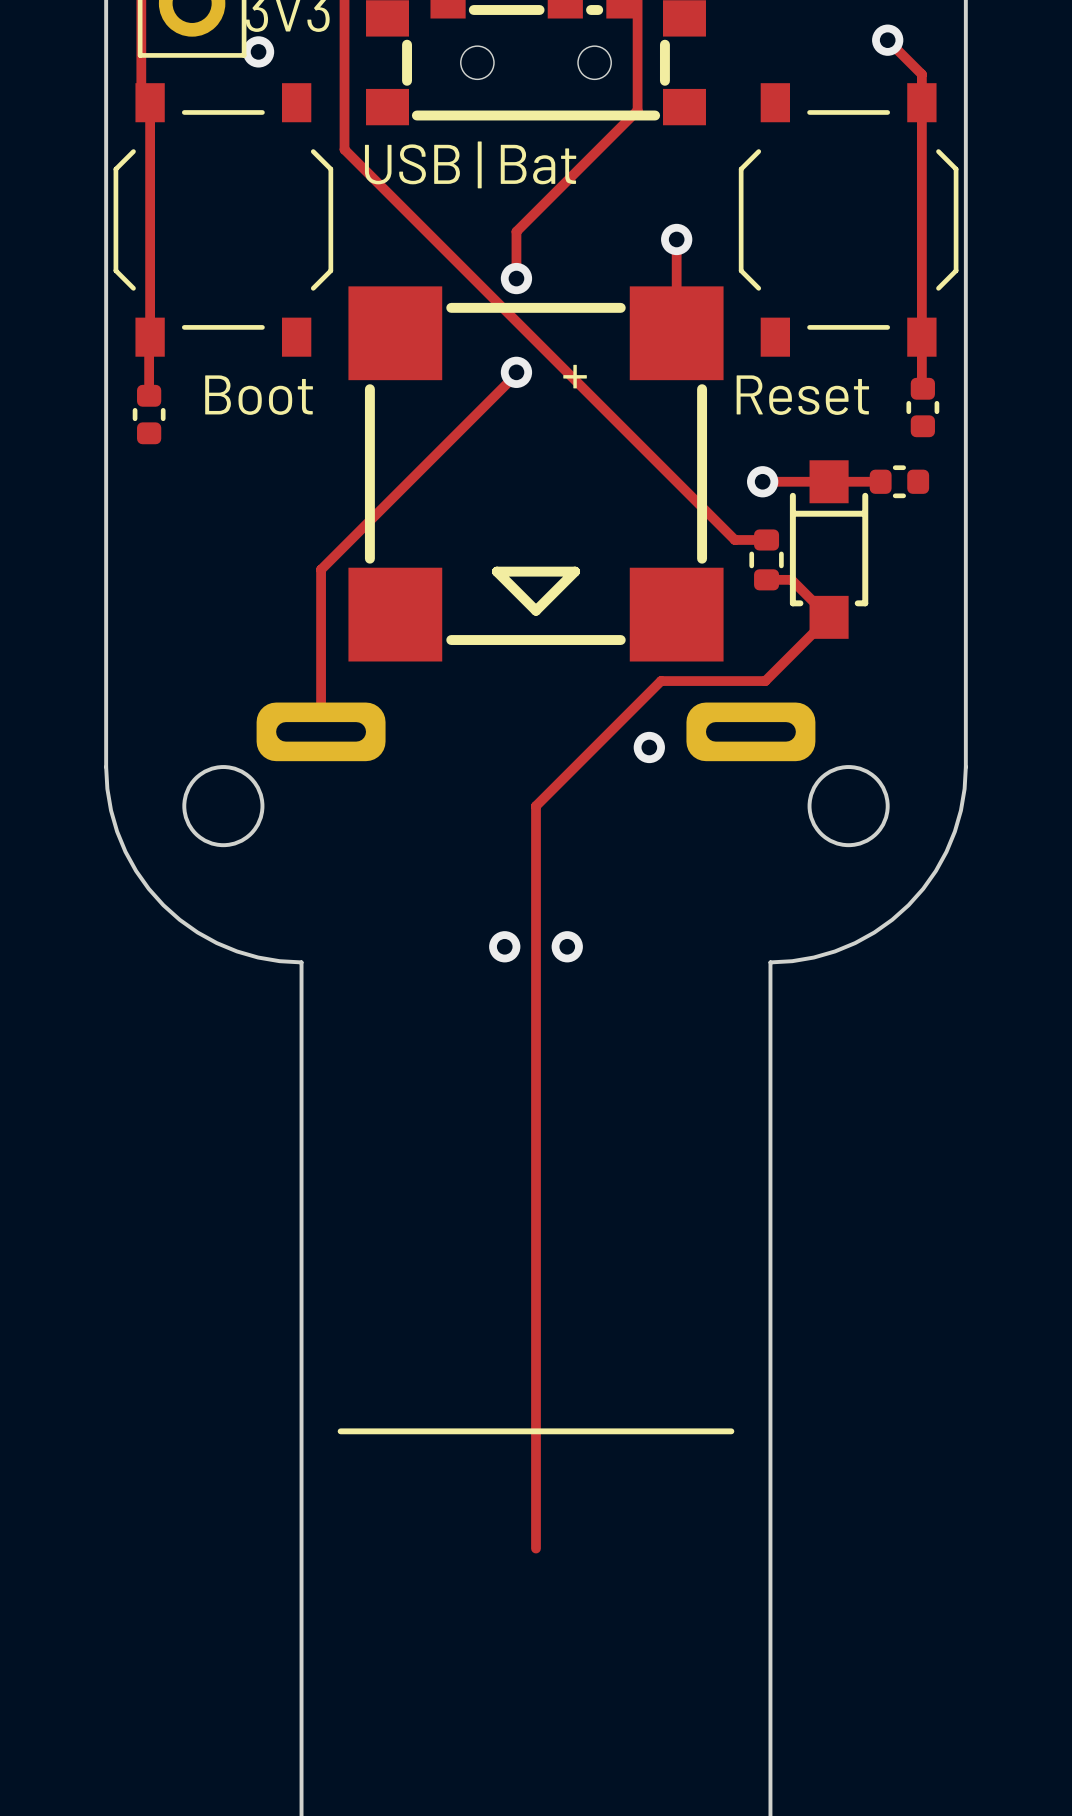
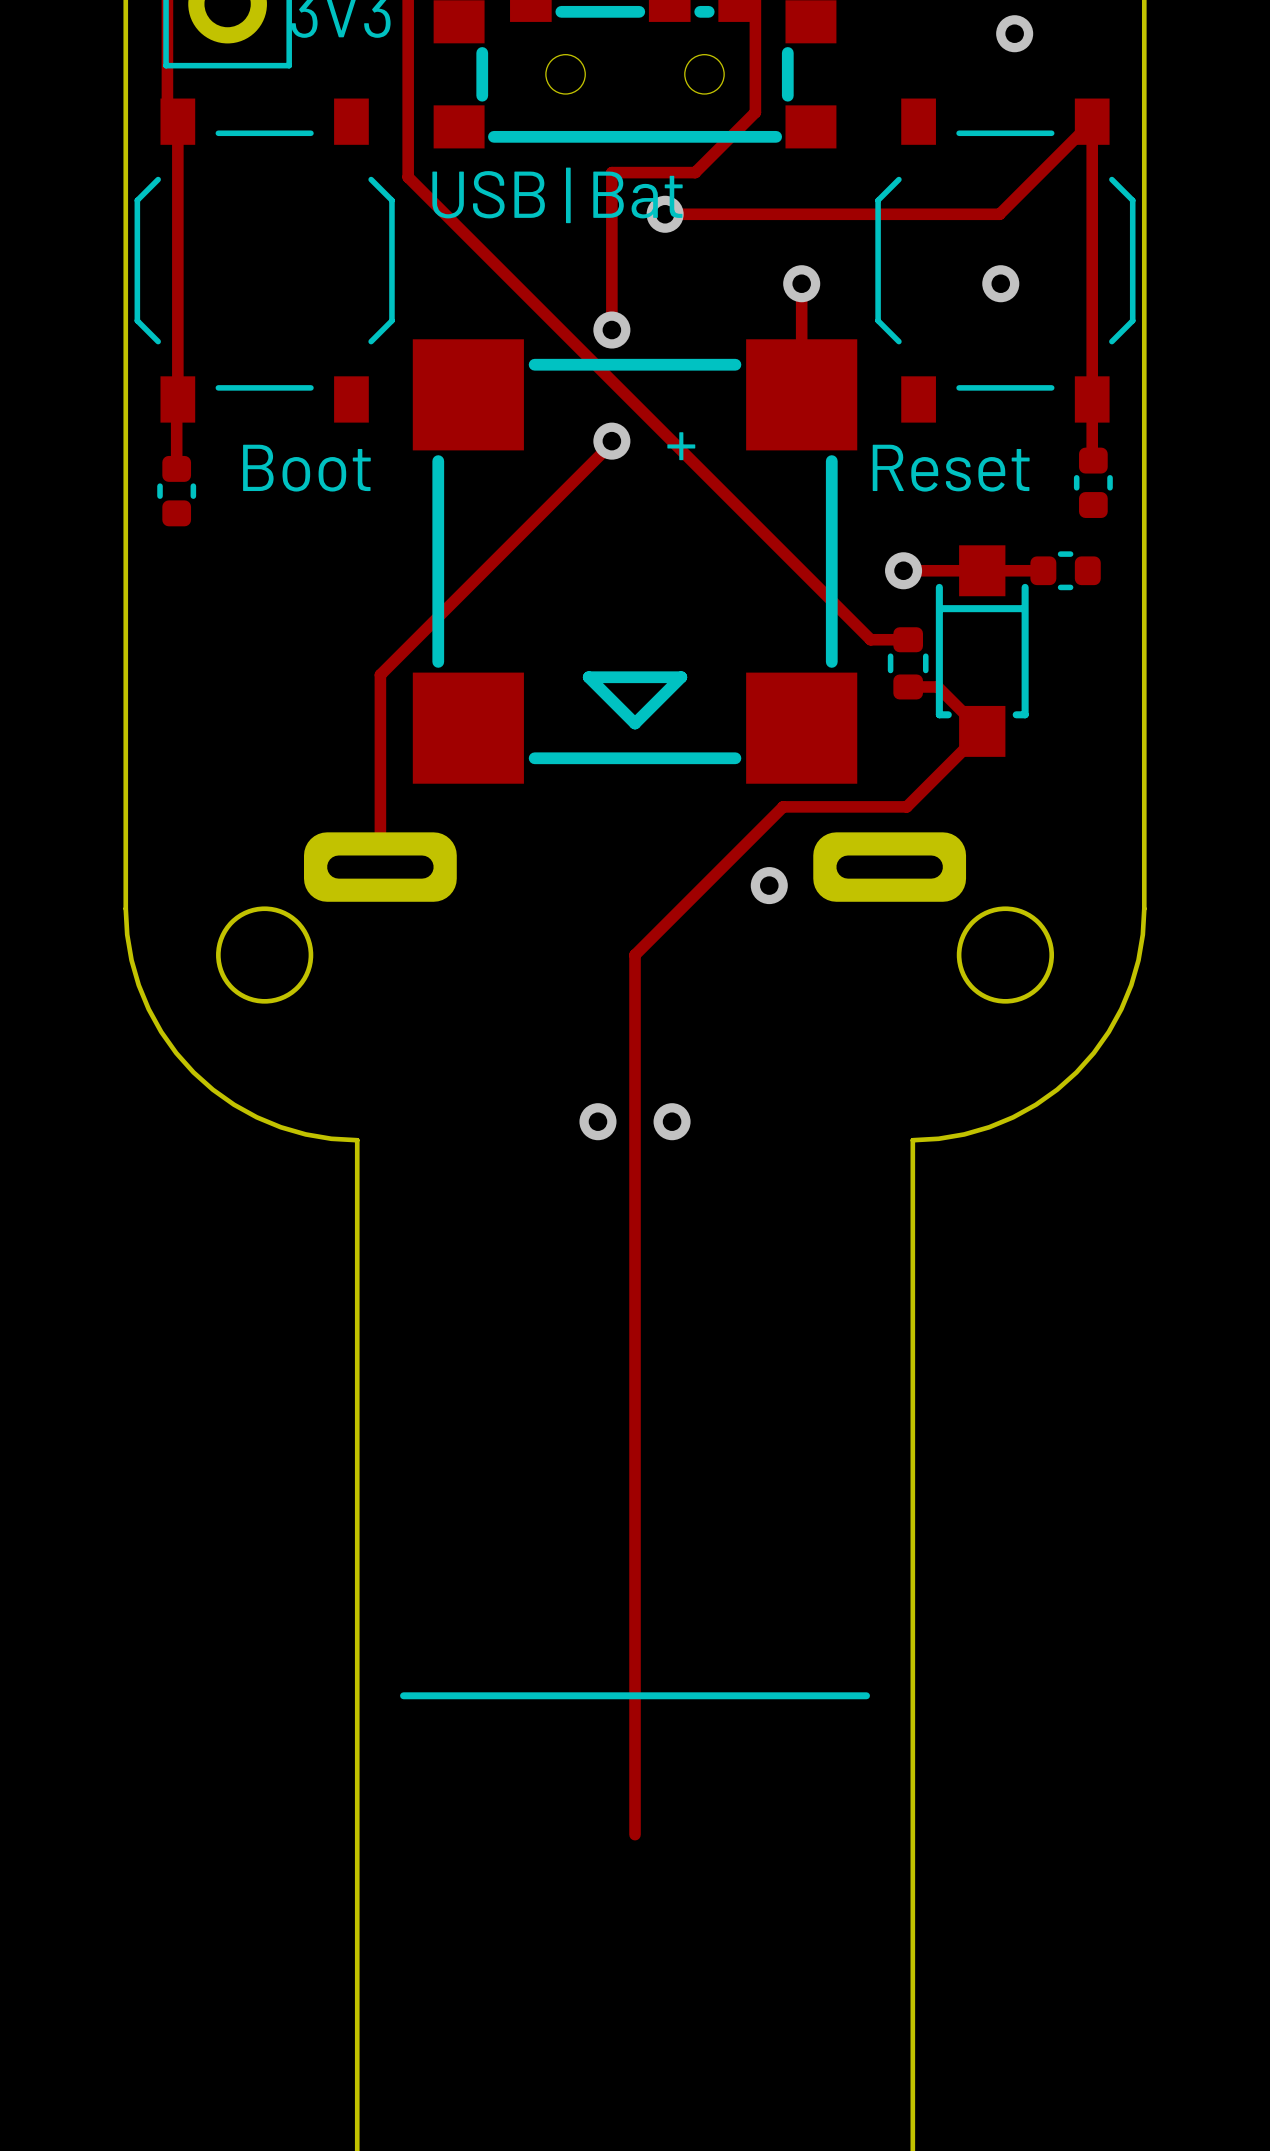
track: (887, 40) (921, 74) (921, 102) -> (665, 214) (999, 214) (1092, 121)
via position: (887, 40) -> (1014, 33)
via: (258, 51) -> none
track: (637, 94) (637, 110) (516, 231) -> (755, 112) (695, 172) (611, 172) (611, 274)
via: none -> (665, 214)
via: none -> (1000, 283)

